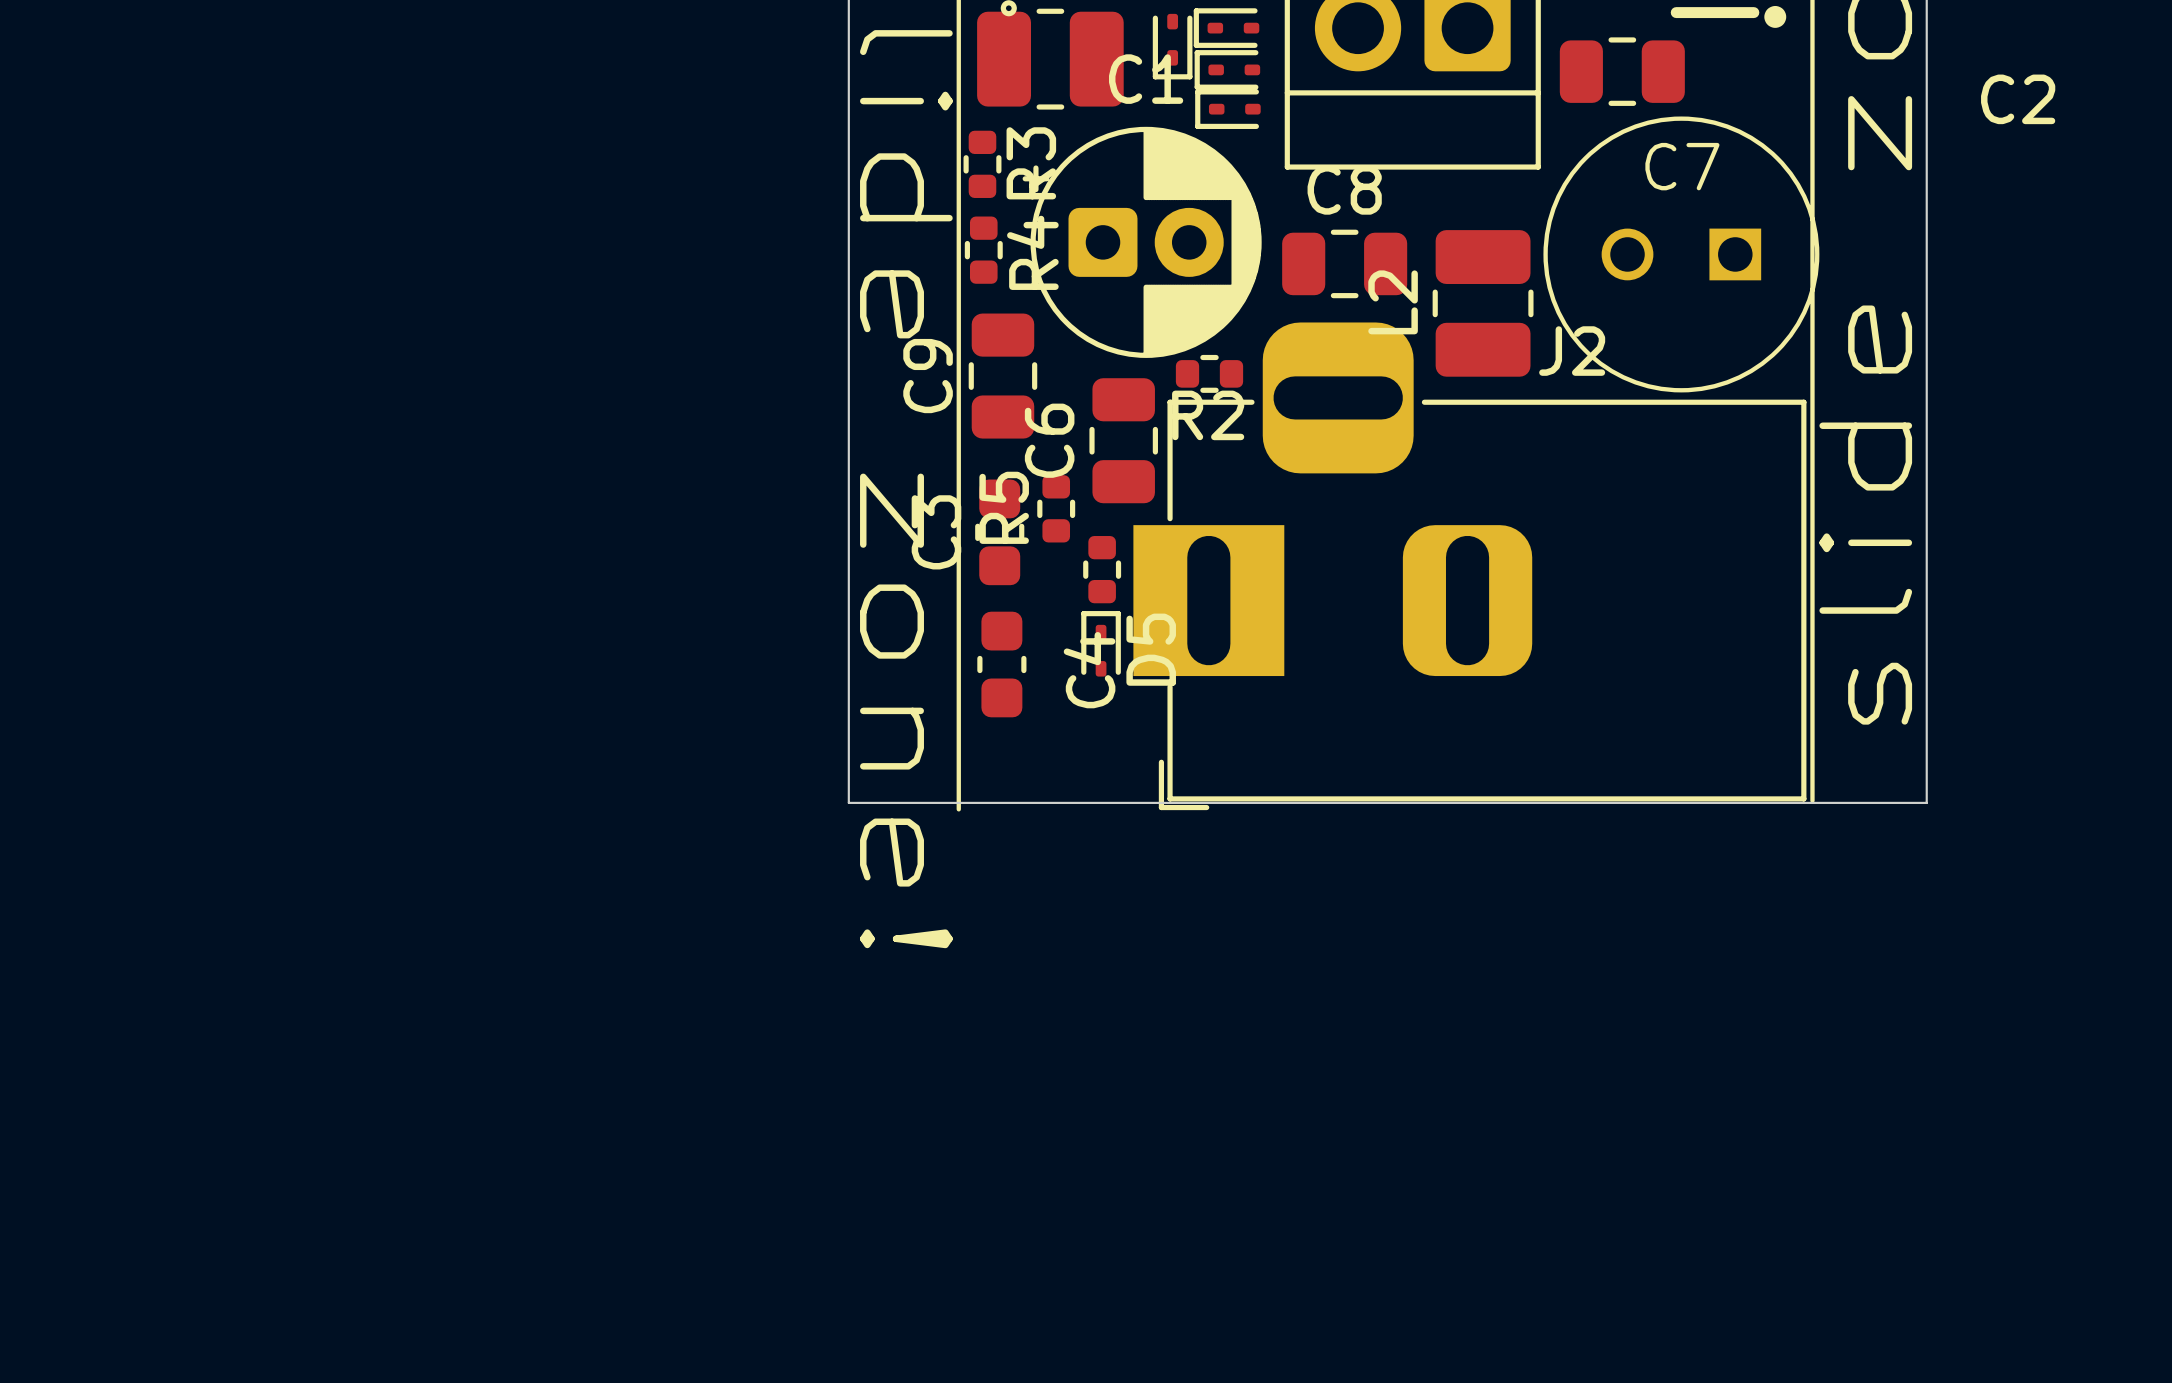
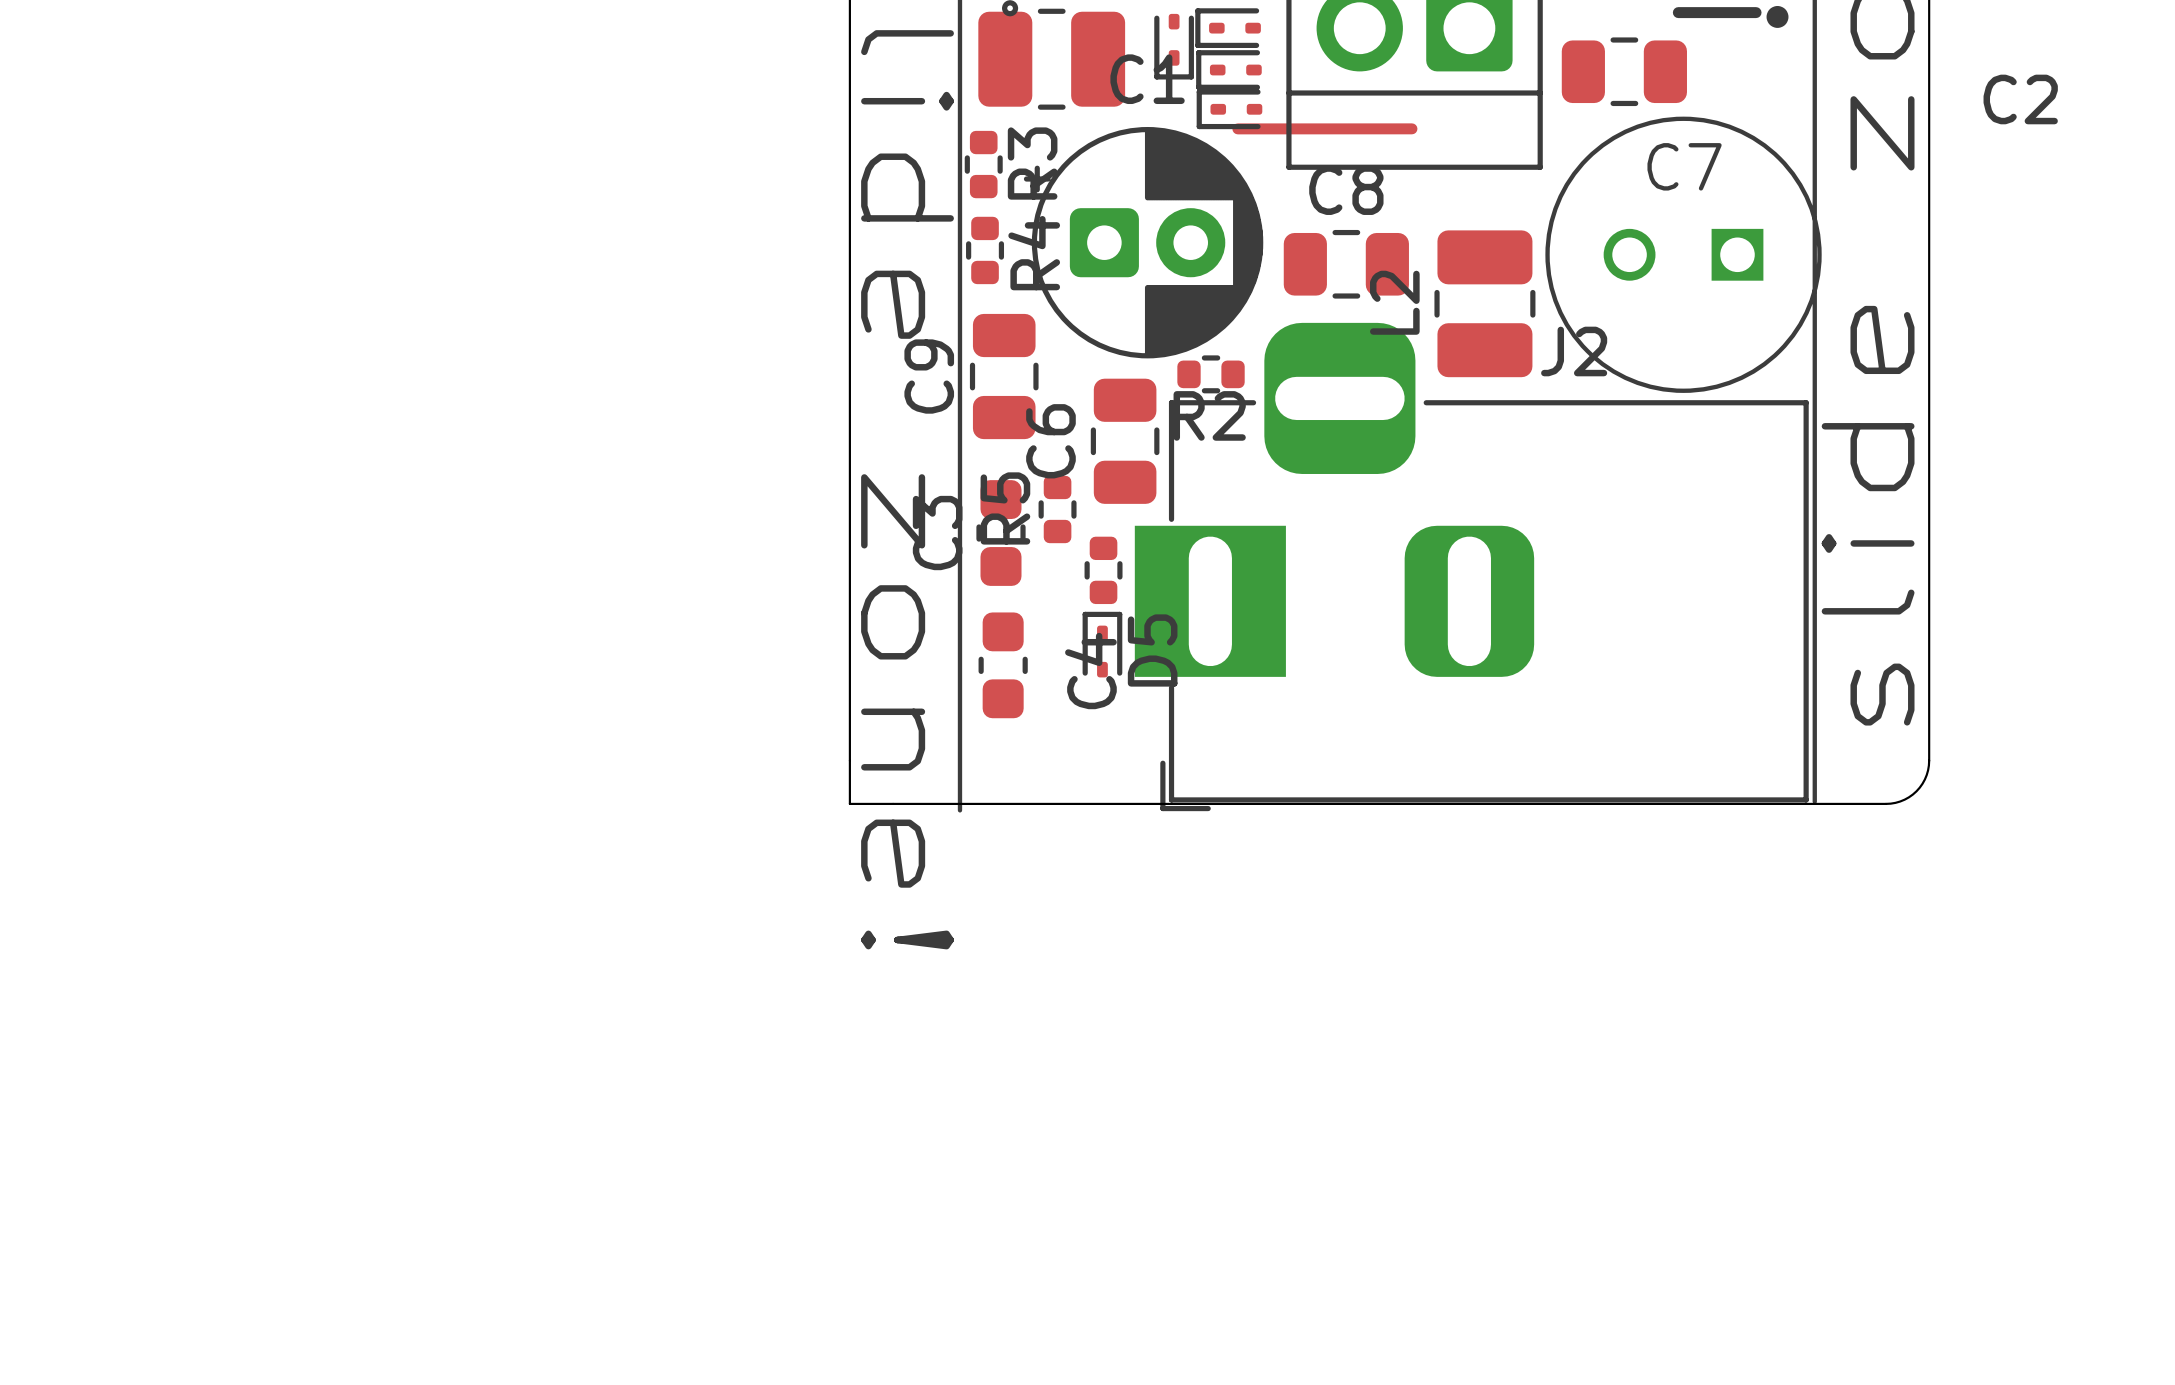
track: none -> (1237, 128) (1411, 128)
board edge: (1926, 759) (1926, 802) (1883, 802) -> (1929, 760) (1924, 779) (1916, 791) (1900, 801) (1886, 803)

